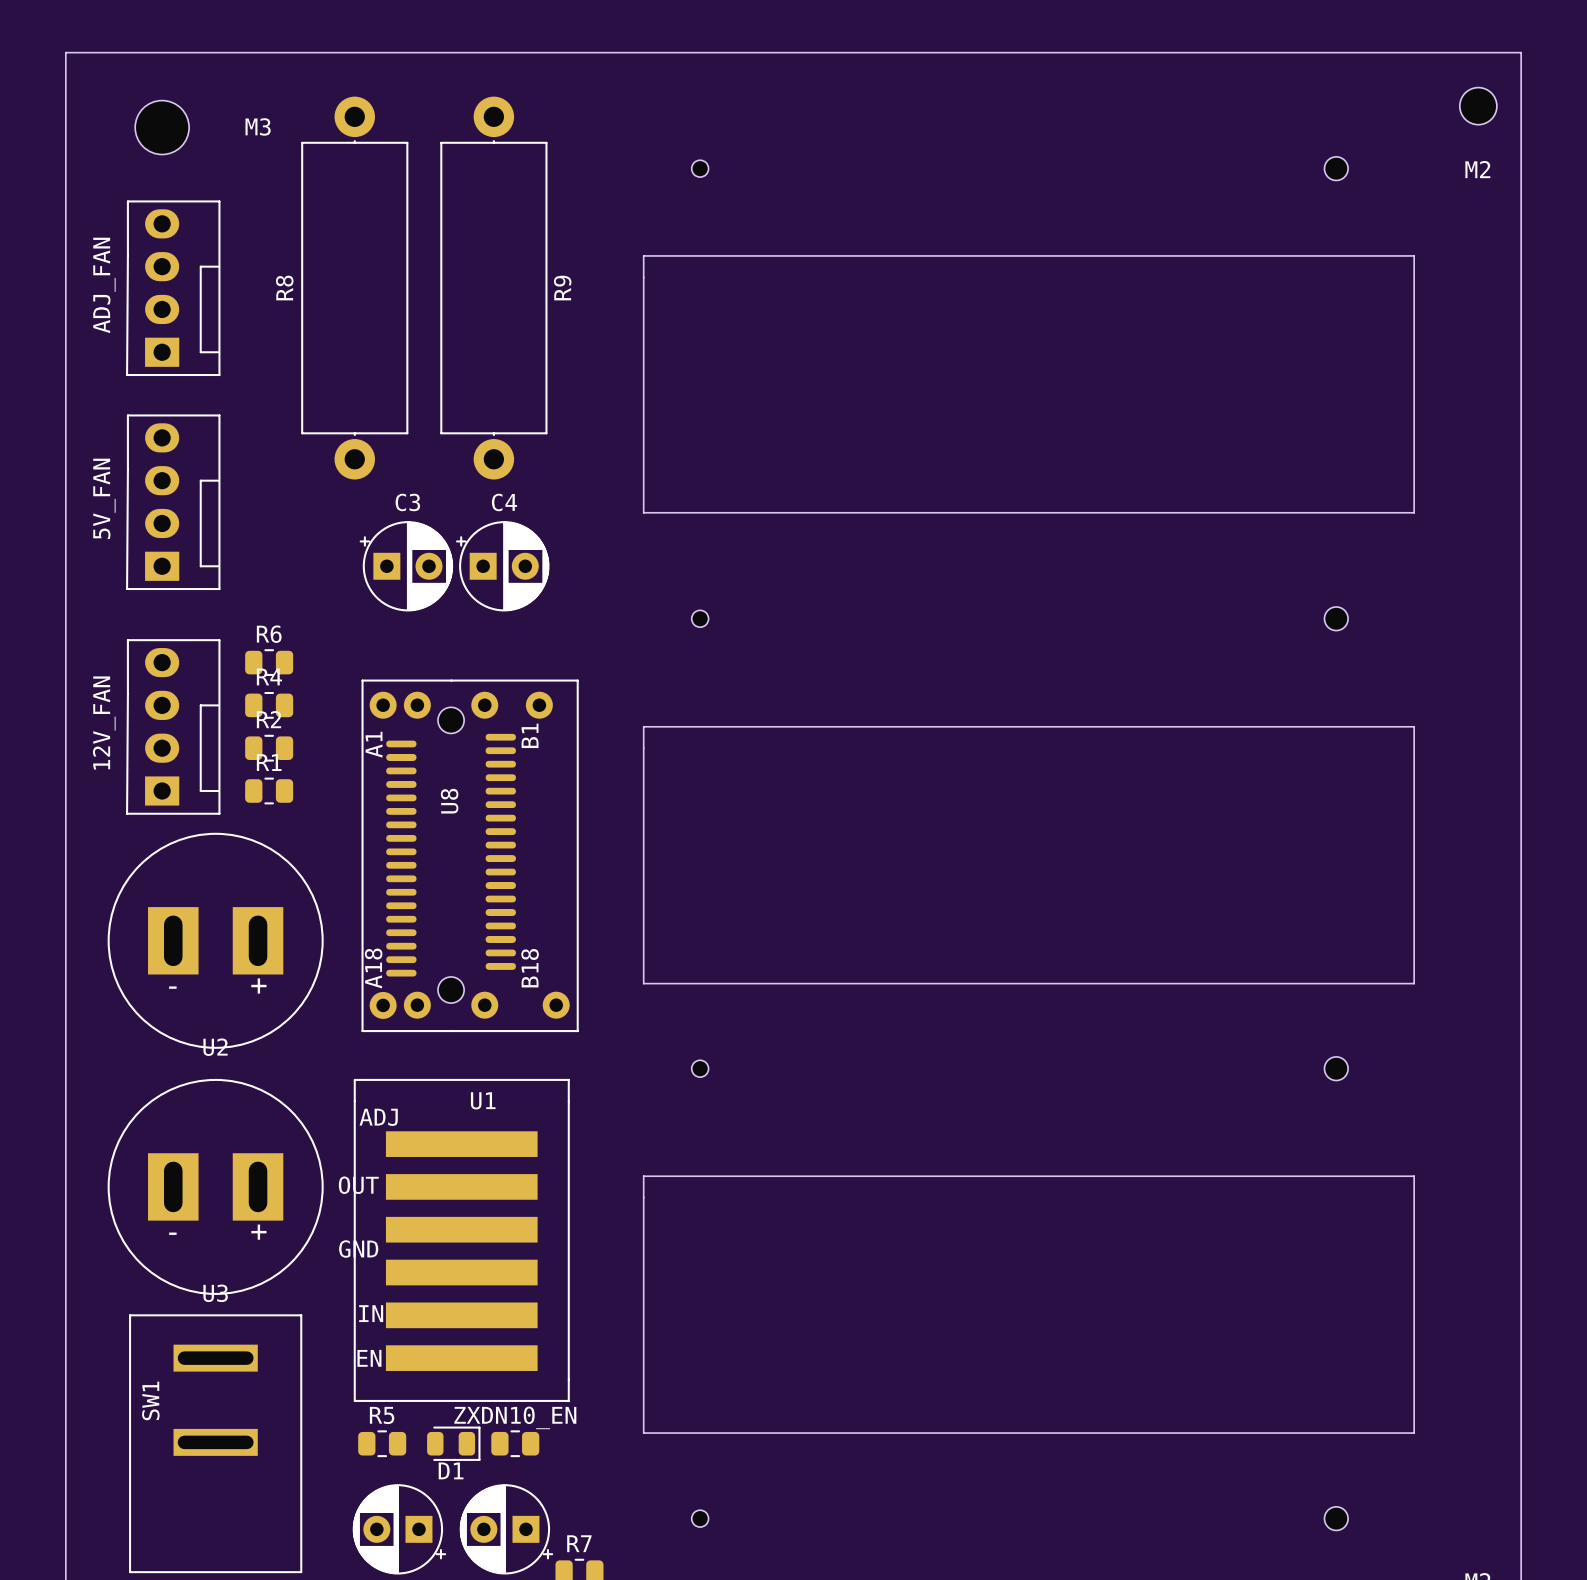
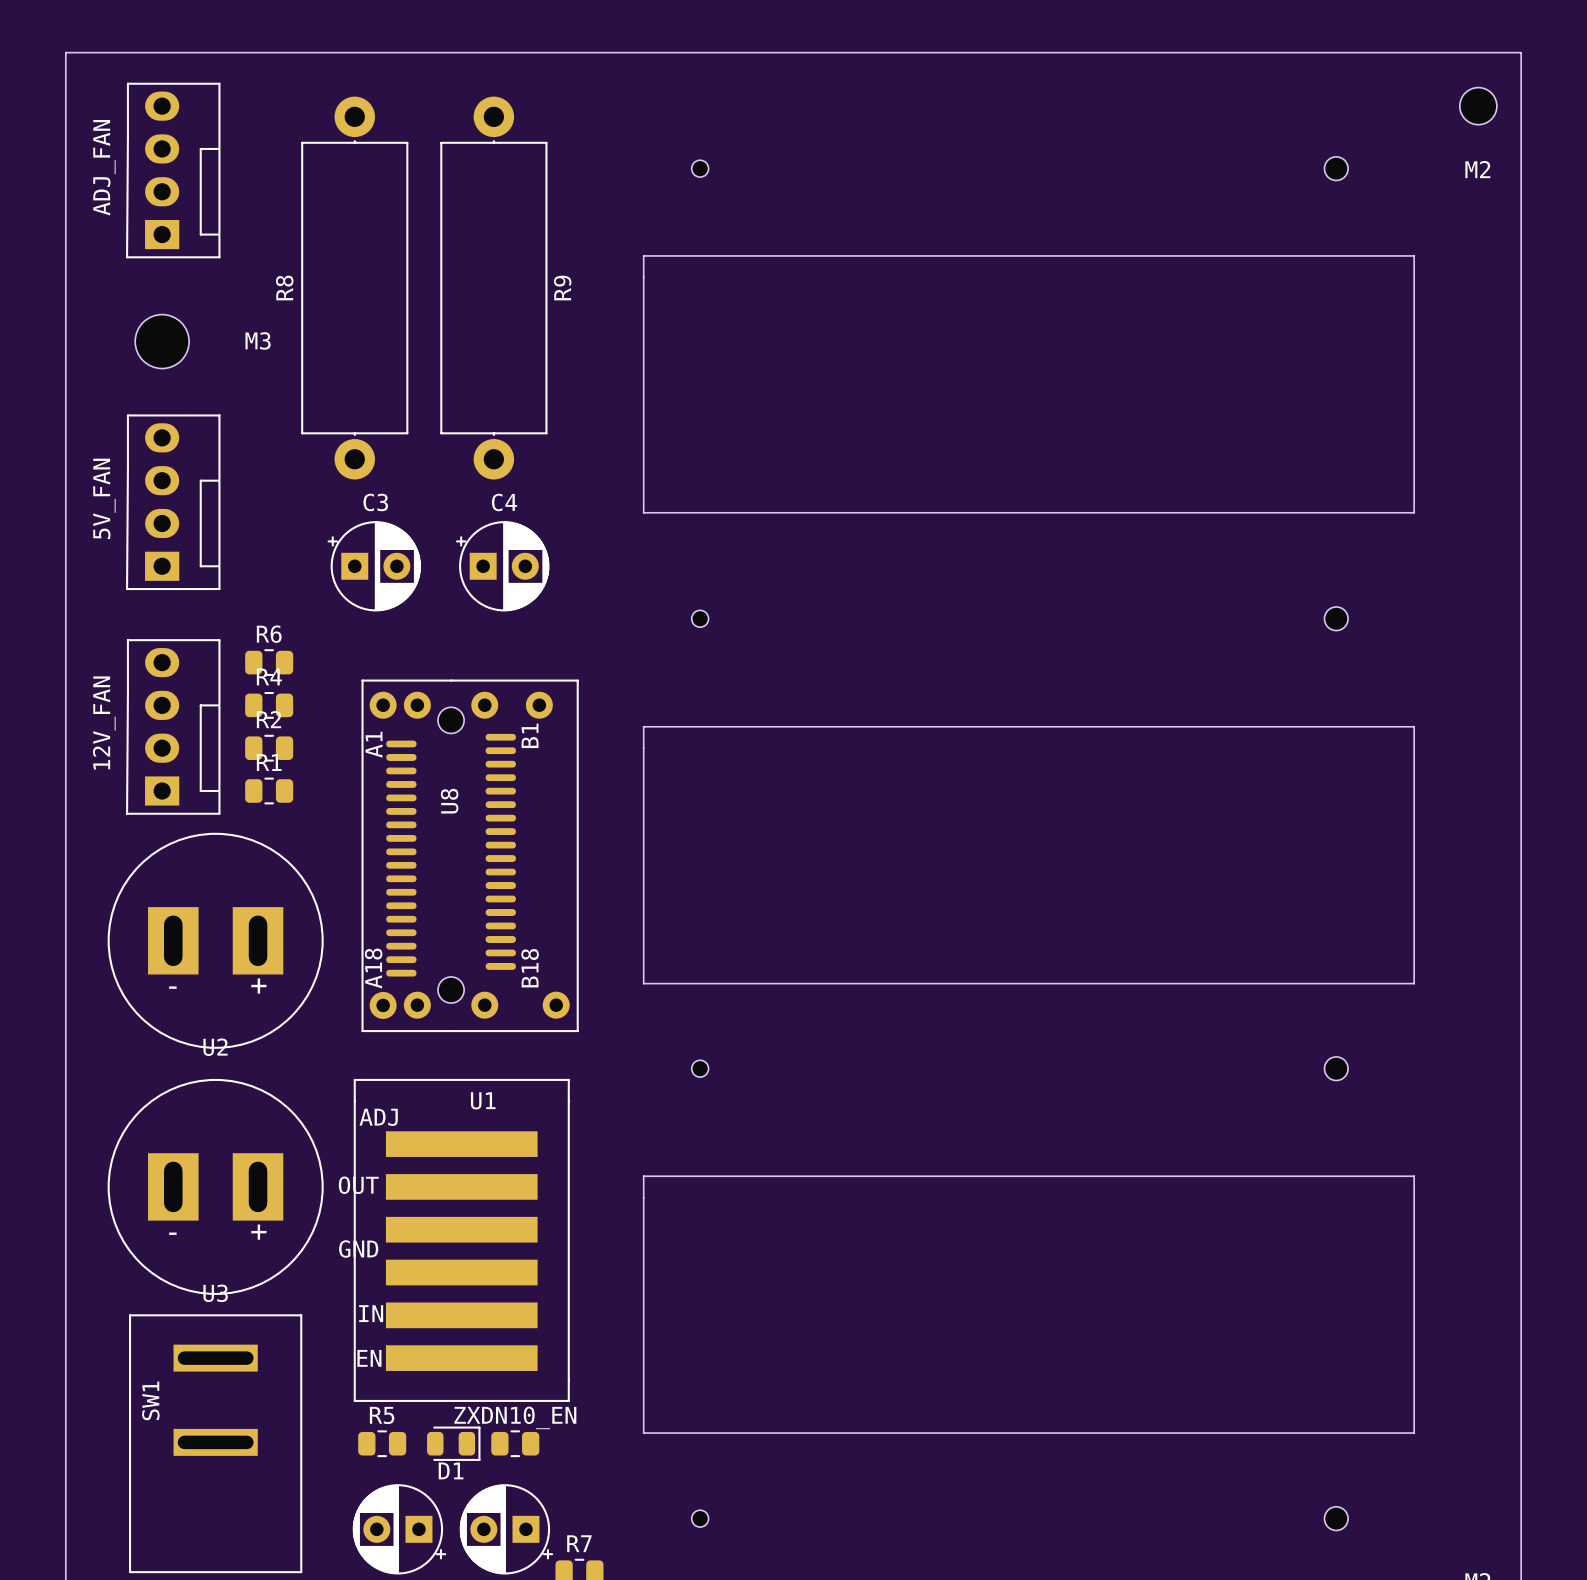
M3 position: (162, 127) -> (162, 341)
ADJ_FAN position: (173, 288) -> (173, 170)
C3 position: (406, 566) -> (374, 566)

